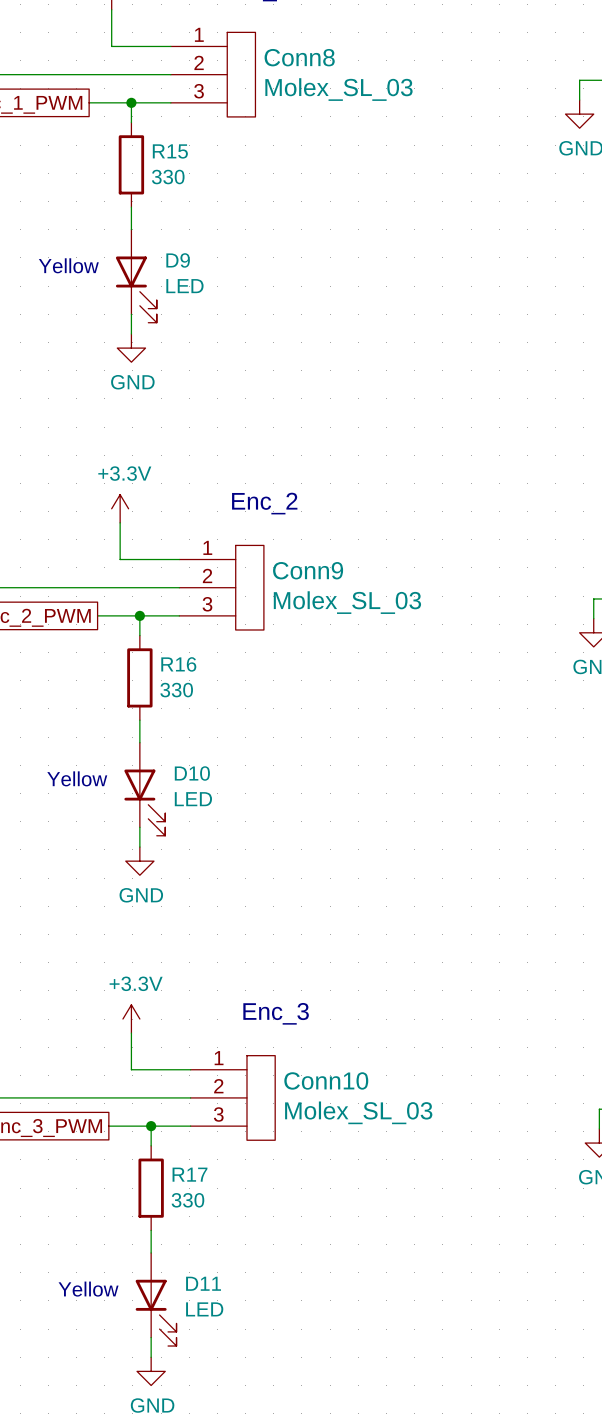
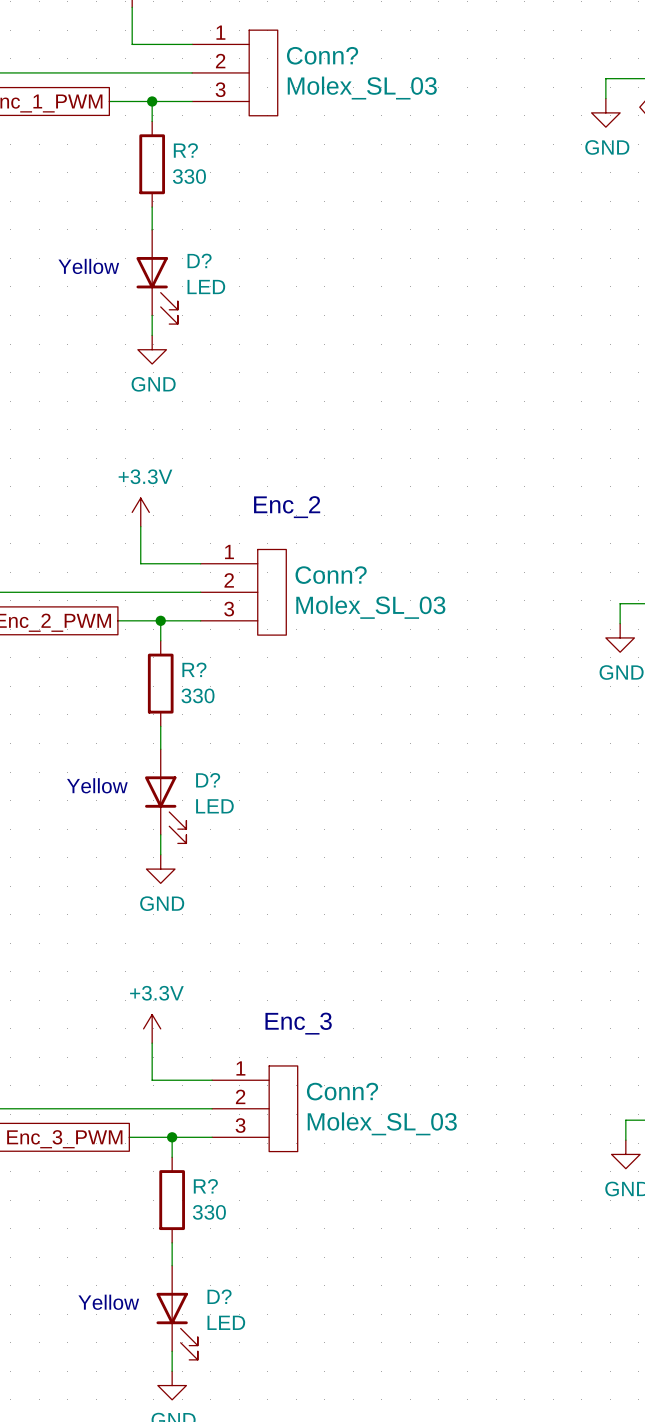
Conn8 name: Conn8 (299, 57) -> Conn? (322, 55)
R15 name: R15 (170, 151) -> R? (185, 150)
D9 name: D9 (178, 260) -> D? (199, 260)
Conn9 name: Conn9 (308, 570) -> Conn? (331, 575)
R16 name: R16 (178, 664) -> R? (194, 669)
D10 name: D10 (192, 773) -> D? (208, 780)
Conn10 name: Conn10 (326, 1080) -> Conn? (342, 1091)
R17 name: R17 (190, 1174) -> R? (205, 1186)
D11 name: D11 (203, 1283) -> D? (219, 1296)

